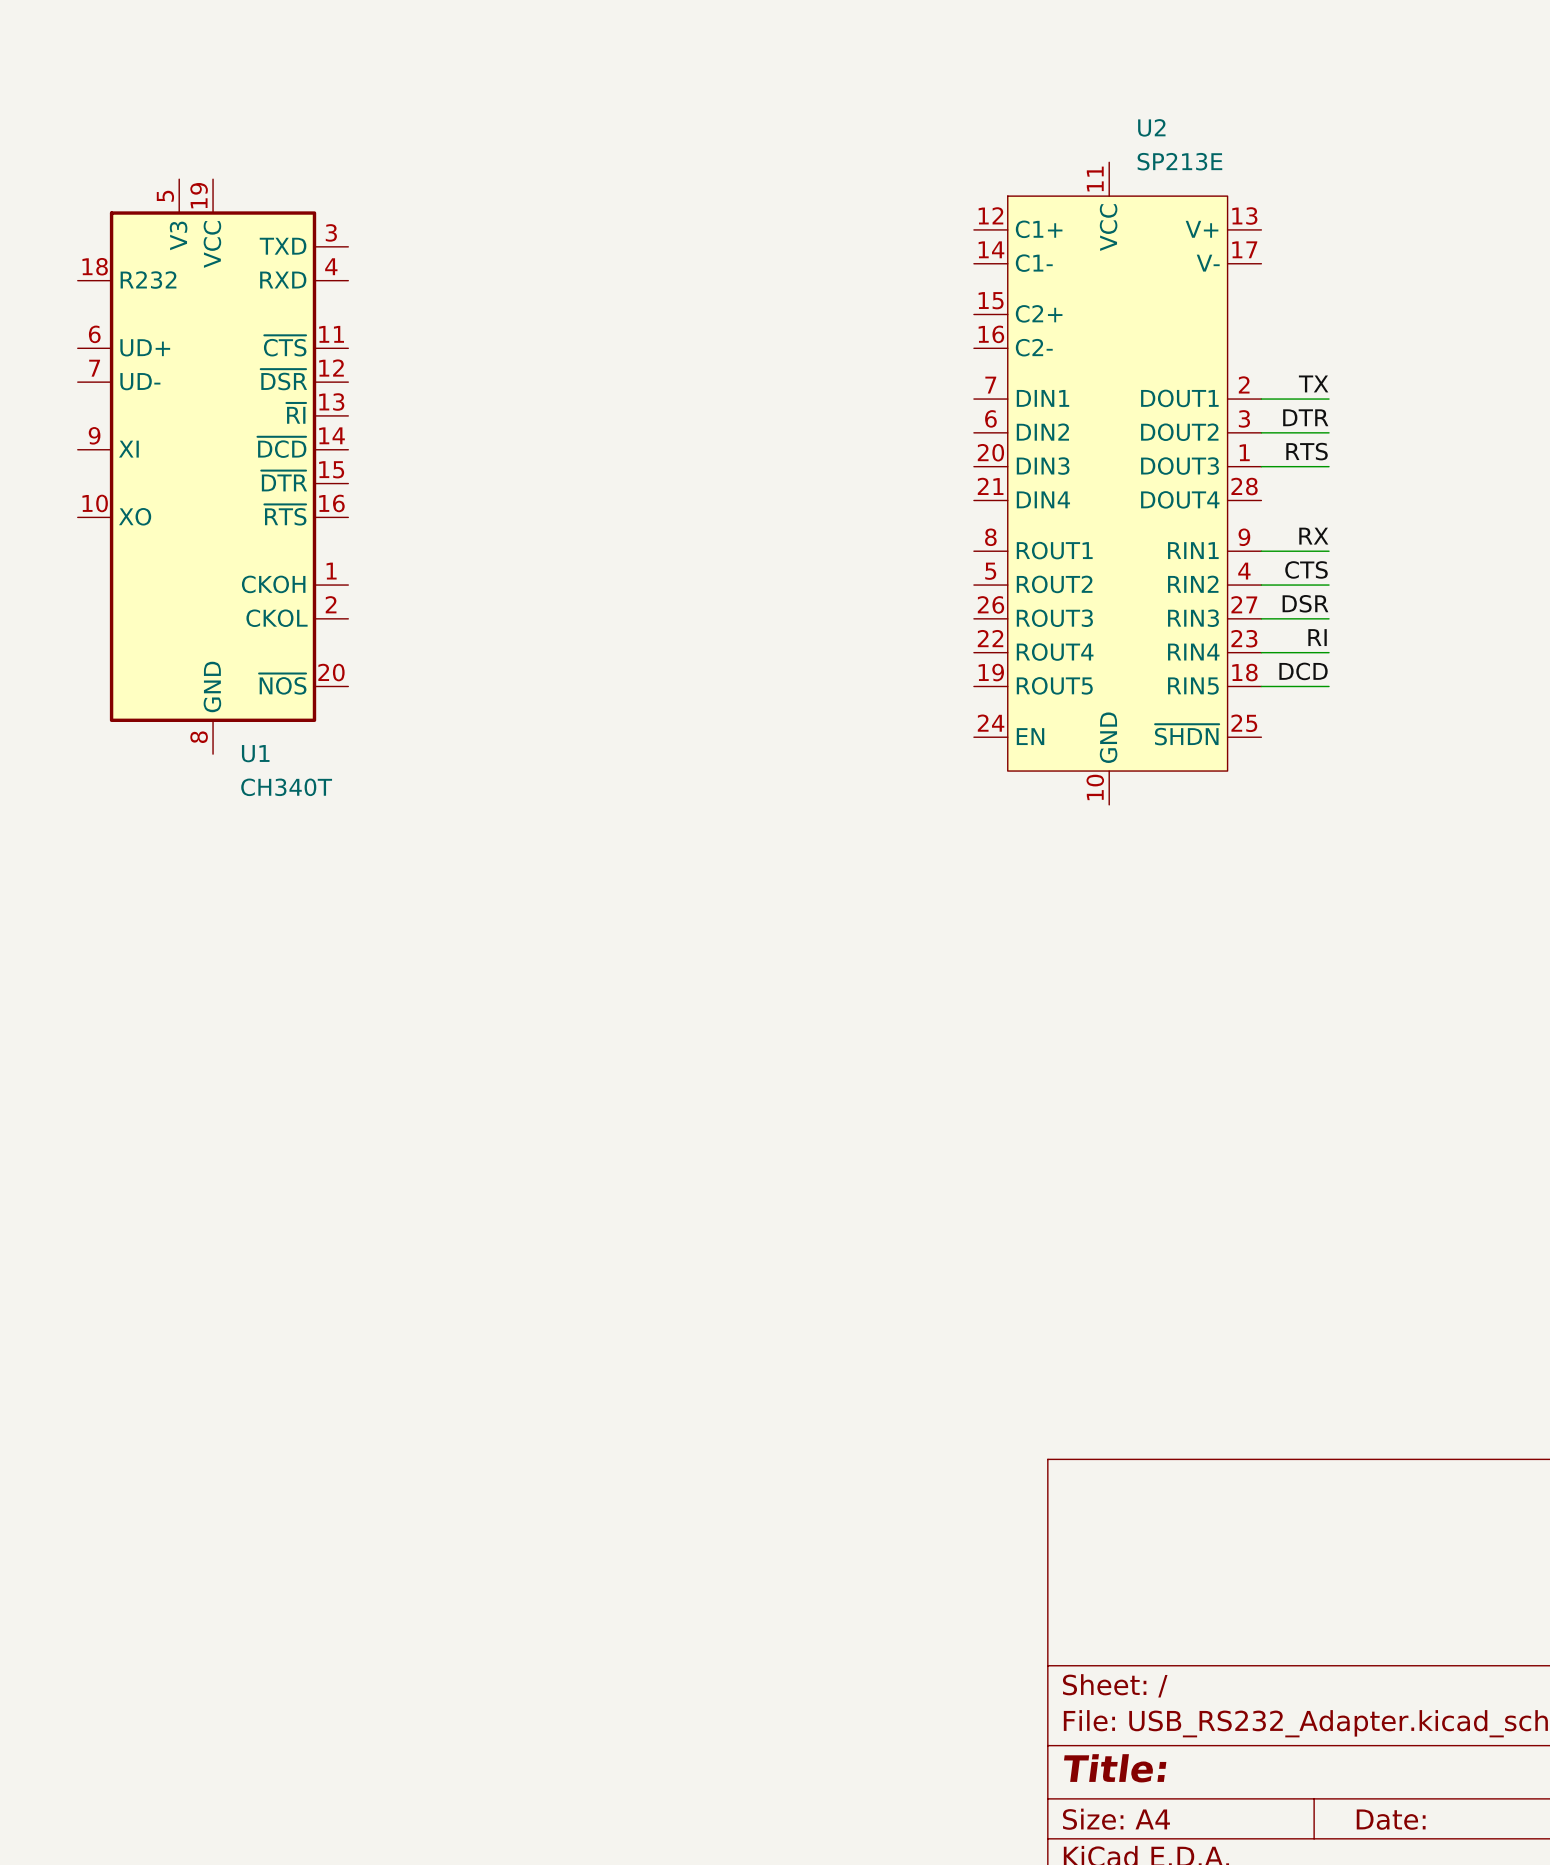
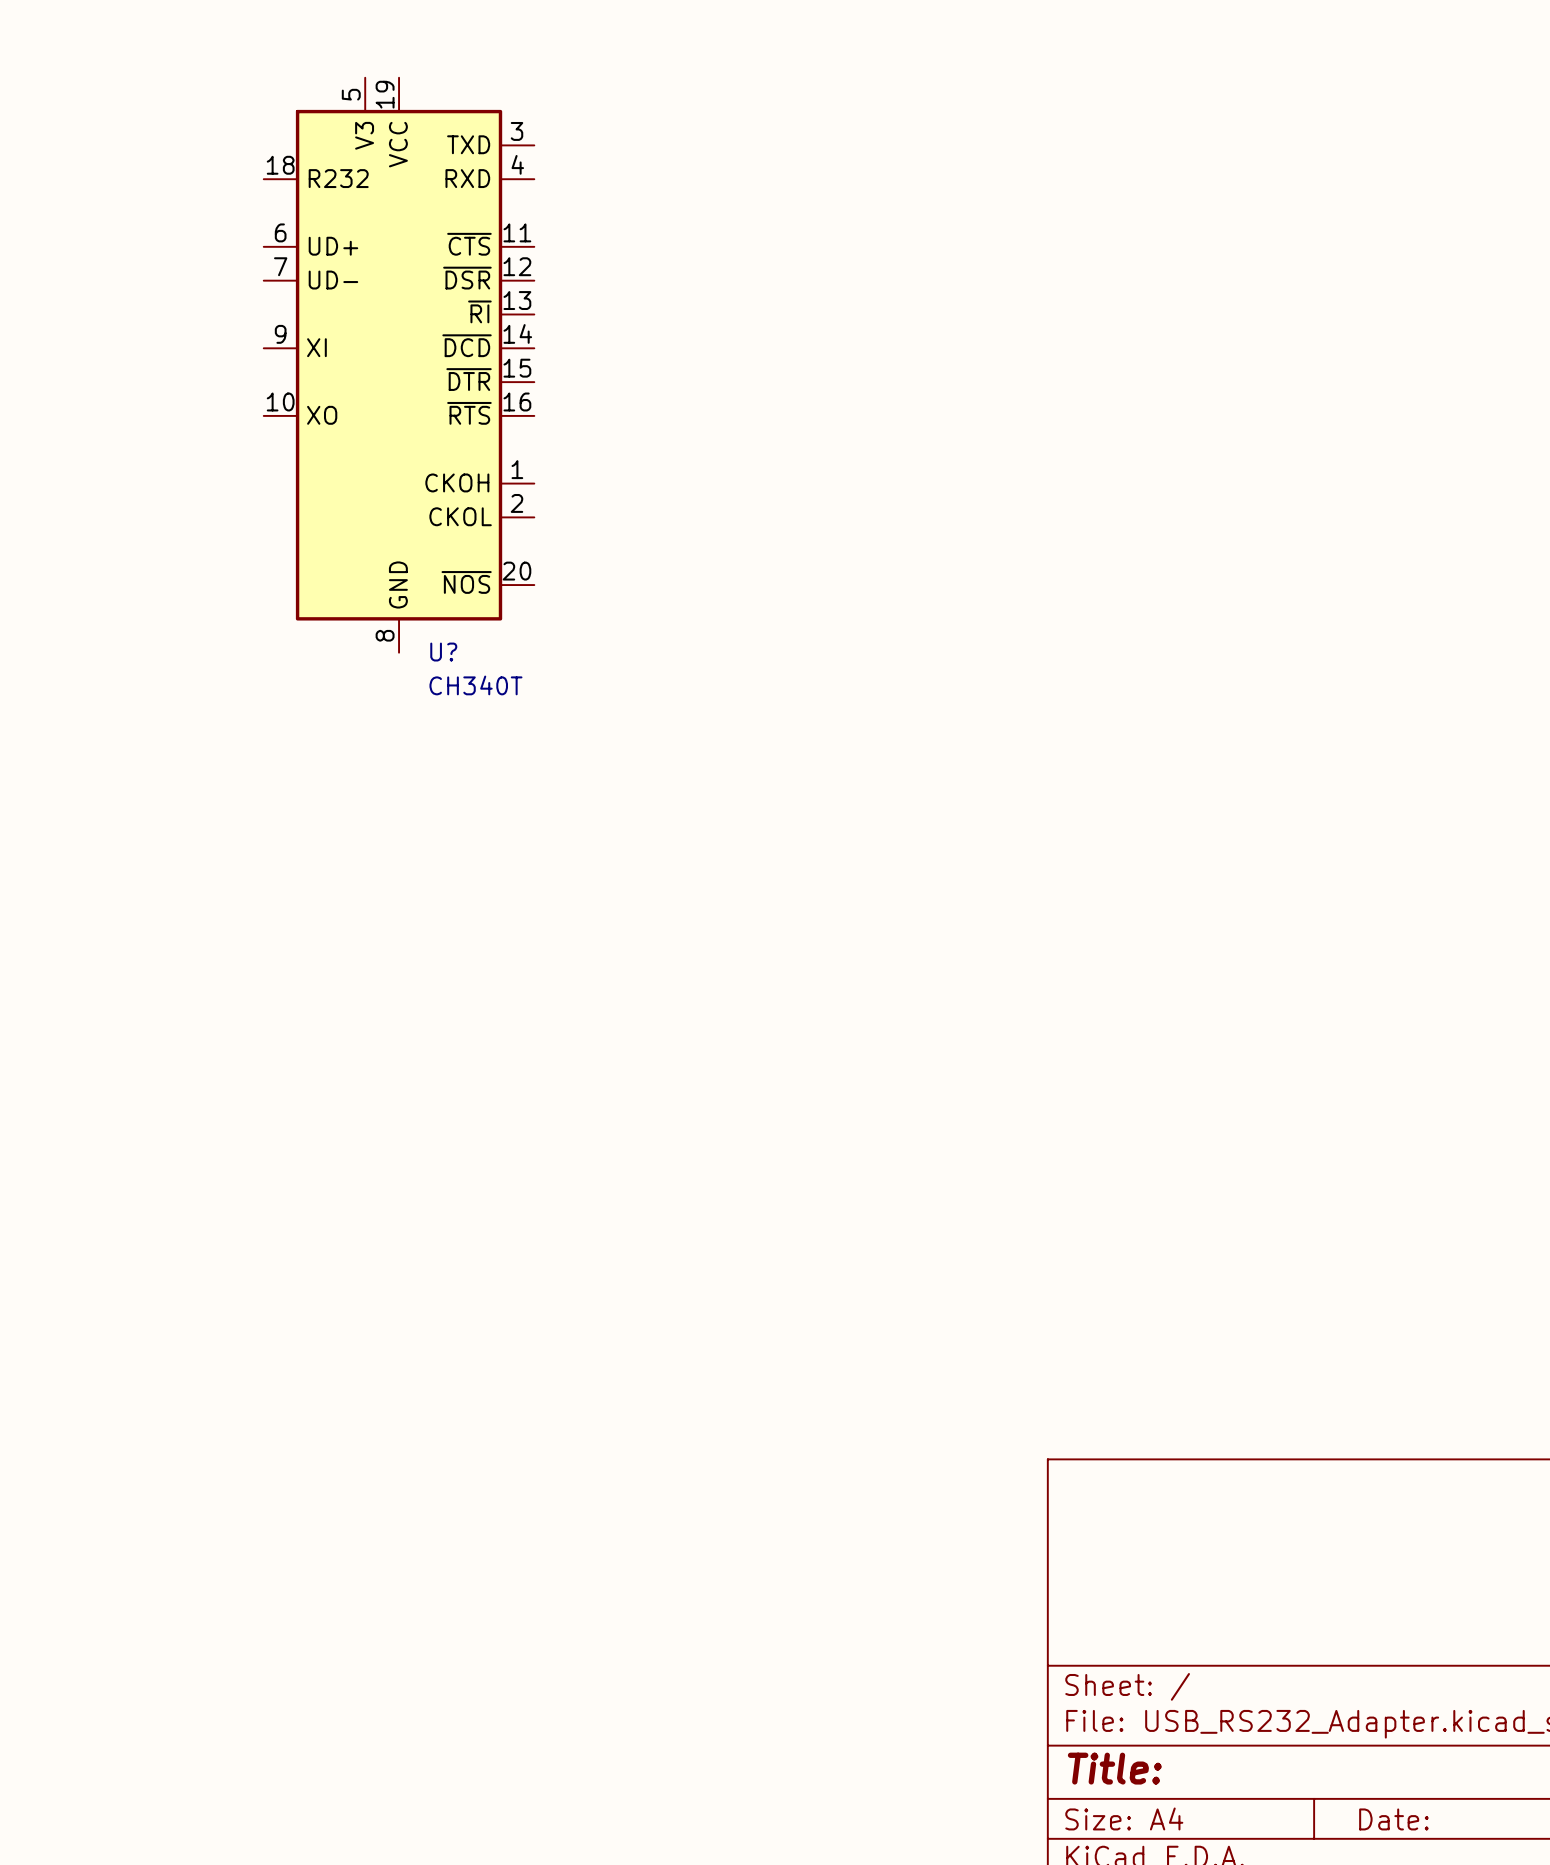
U?: none -> CH340T (399, 365)
label: TX (1313, 383) -> none
wire: (1261, 399) (1329, 399) -> none
label: DTR (1305, 417) -> none
wire: (1261, 432) (1329, 432) -> none
label: RTS (1307, 451) -> none
U1: CH340T (213, 466) -> none
wire: (1261, 466) (1329, 466) -> none
U2: SP213E (1117, 483) -> none
label: RX (1313, 536) -> none
wire: (1261, 551) (1329, 551) -> none
label: CTS (1306, 569) -> none
wire: (1261, 585) (1329, 585) -> none
label: DSR (1305, 603) -> none
wire: (1261, 618) (1329, 618) -> none
label: RI (1317, 637) -> none
wire: (1261, 652) (1329, 652) -> none
label: DCD (1303, 671) -> none
wire: (1261, 686) (1329, 686) -> none

